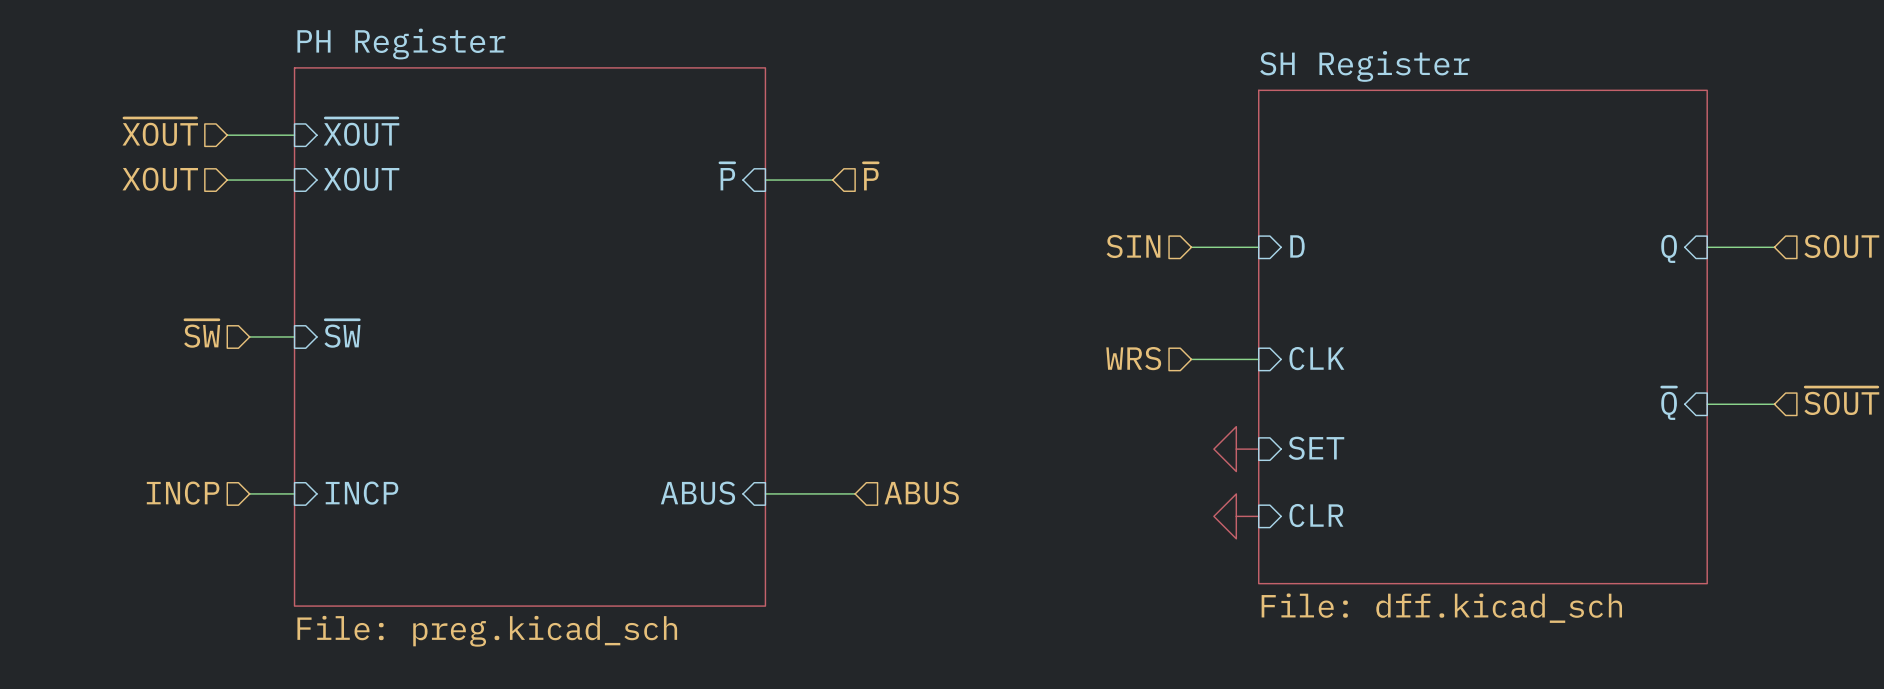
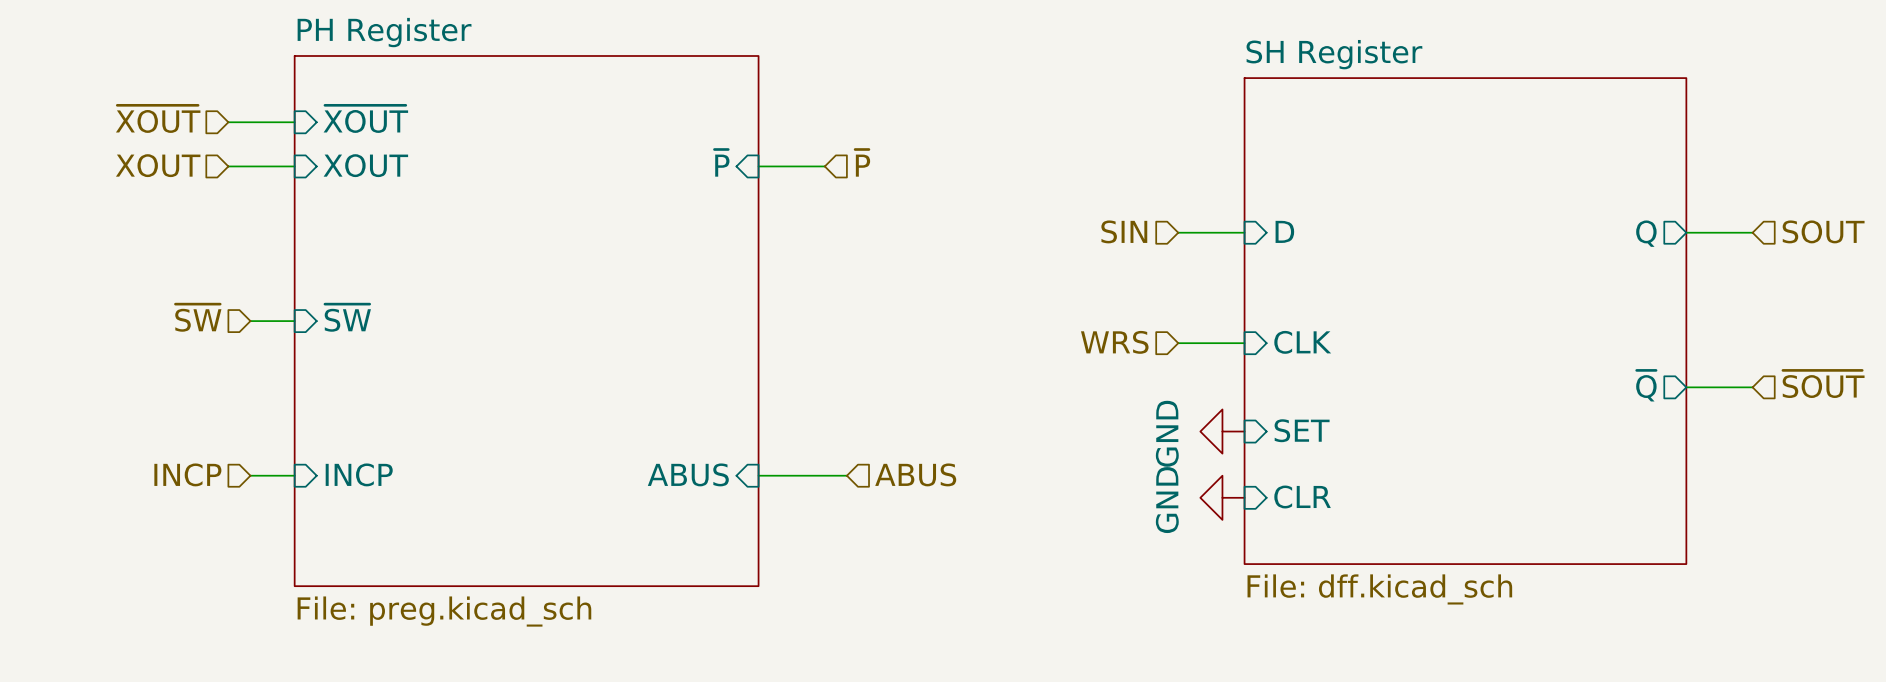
sheet pin shape: input (1669, 248) -> output (1646, 233)
sheet pin shape: input (1669, 403) -> output (1646, 385)
power symbol text: none -> GND (1167, 433)
power symbol text: none -> GND (1167, 500)

